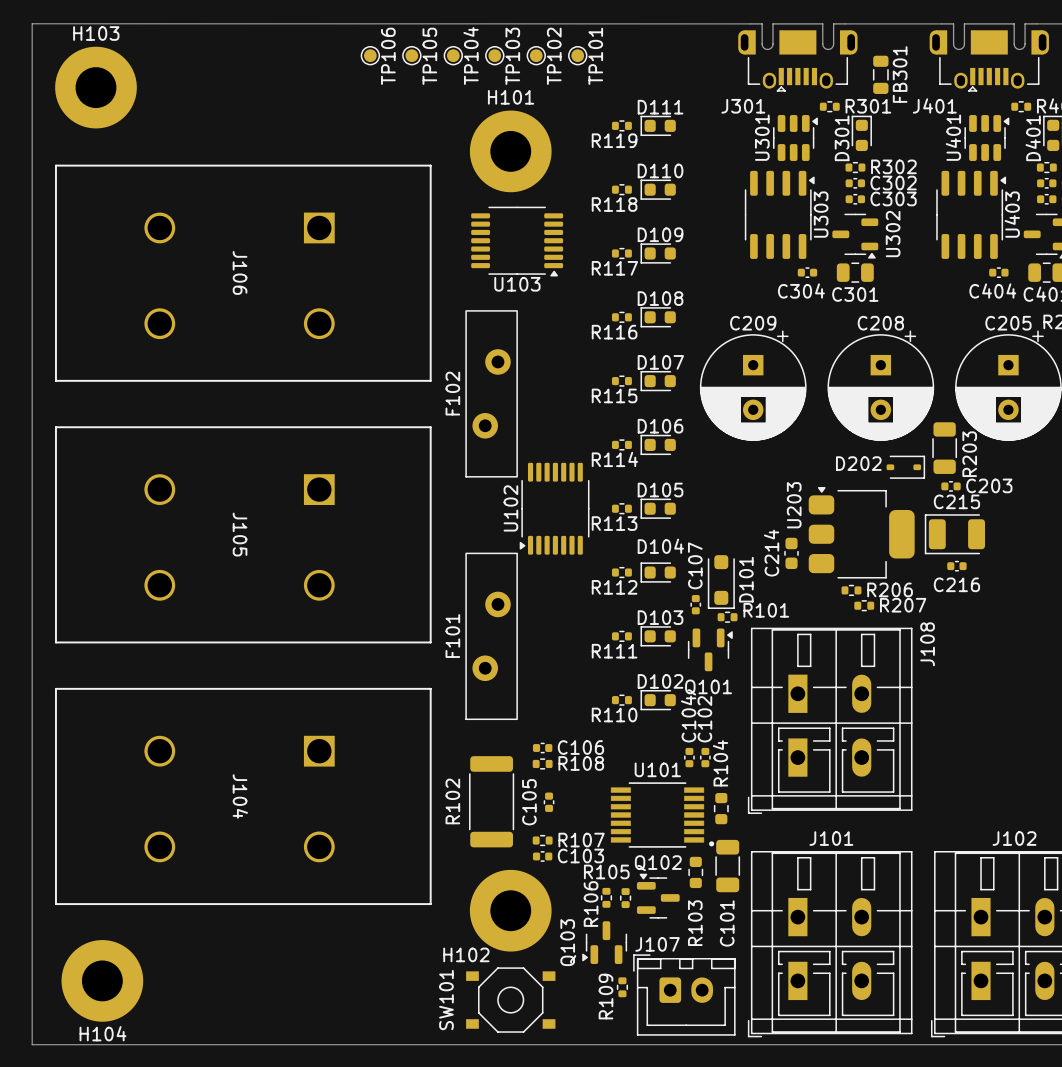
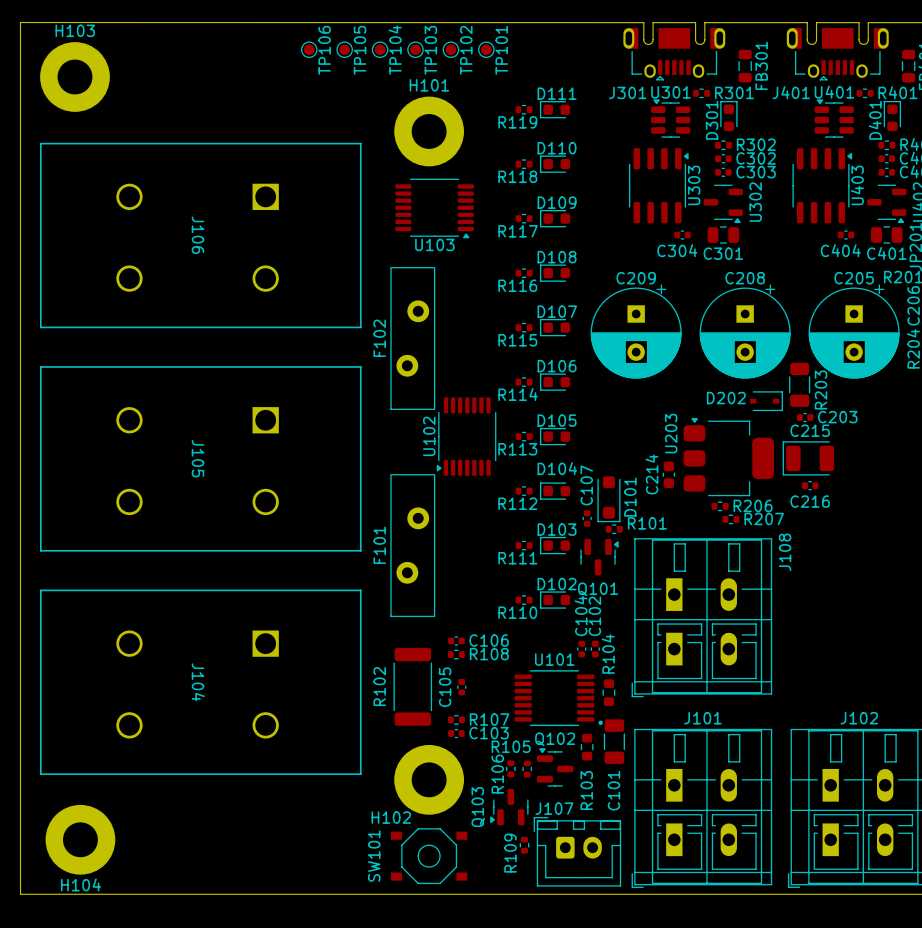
U301 name position: U301 (762, 137) -> U301 (670, 92)
U401 name position: U401 (953, 137) -> U401 (834, 92)
U301 rotation: 0° (795, 138) -> 90° counterclockwise (670, 118)
U401 rotation: 0° (986, 138) -> 90° counterclockwise (834, 118)

